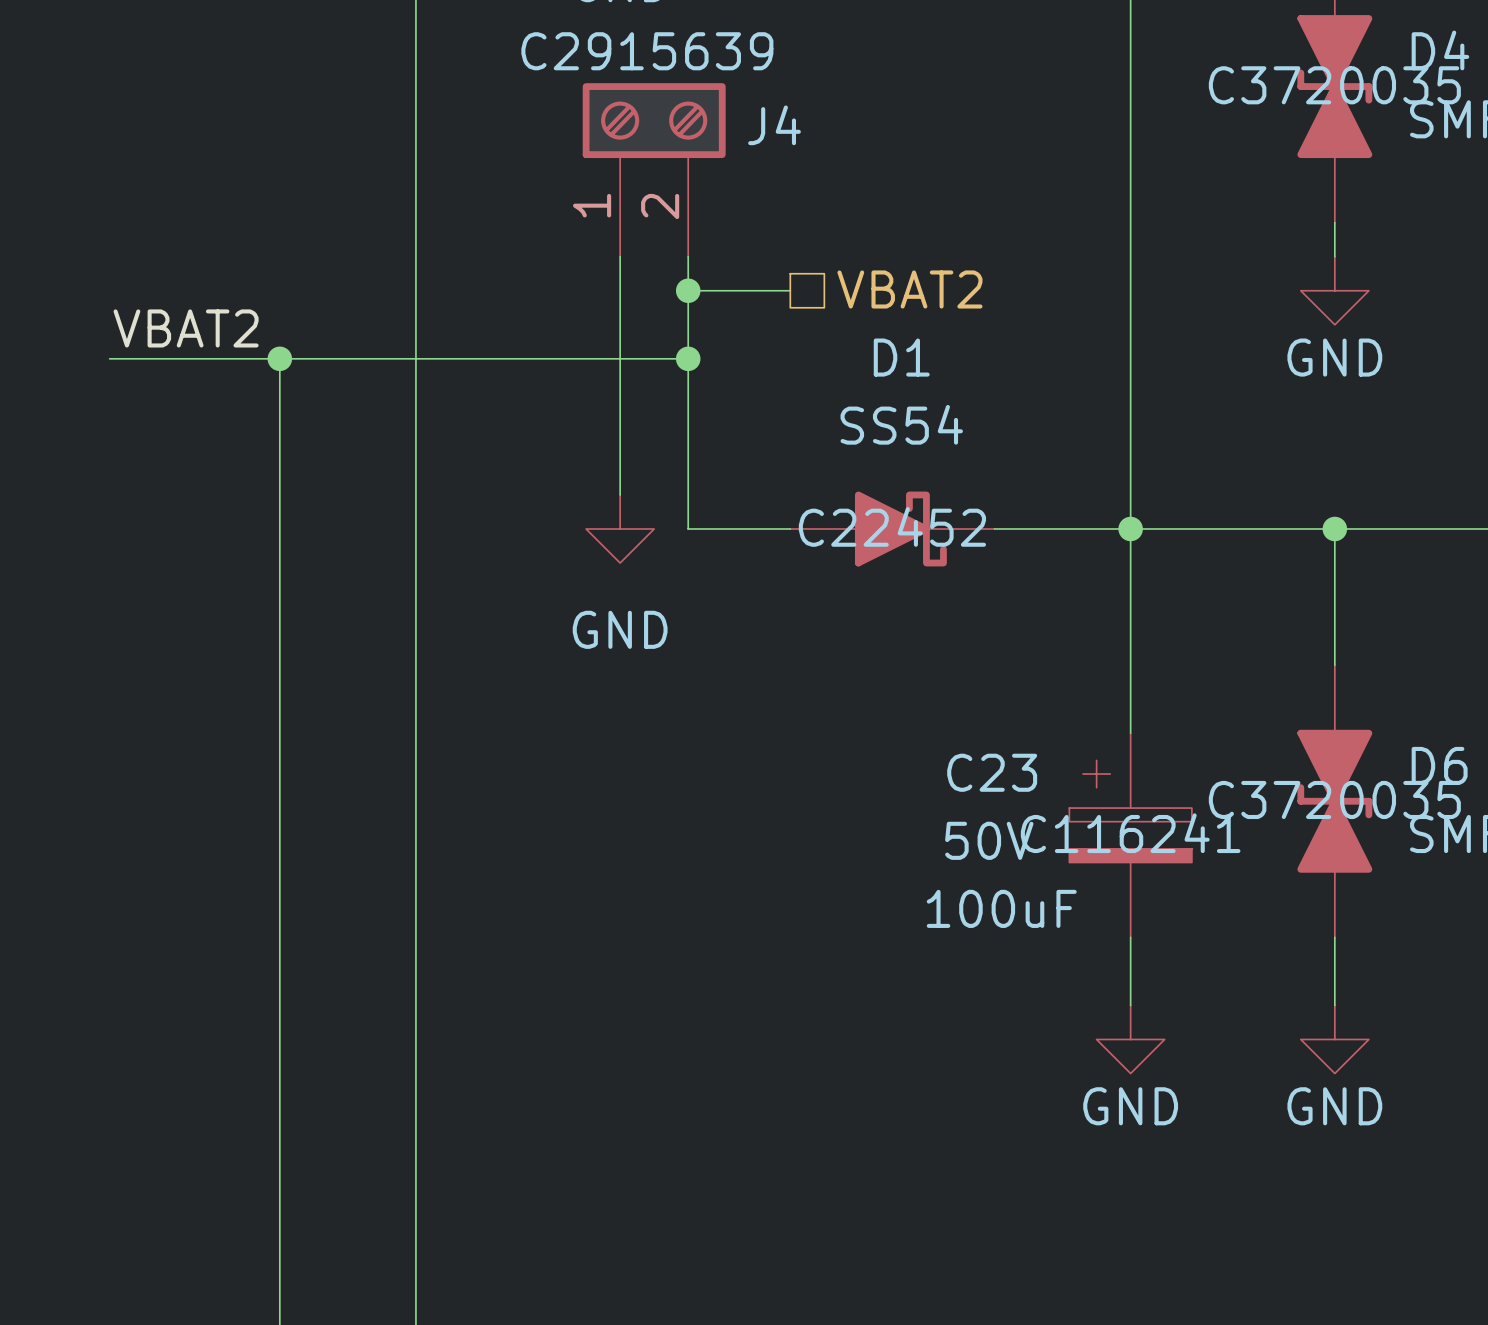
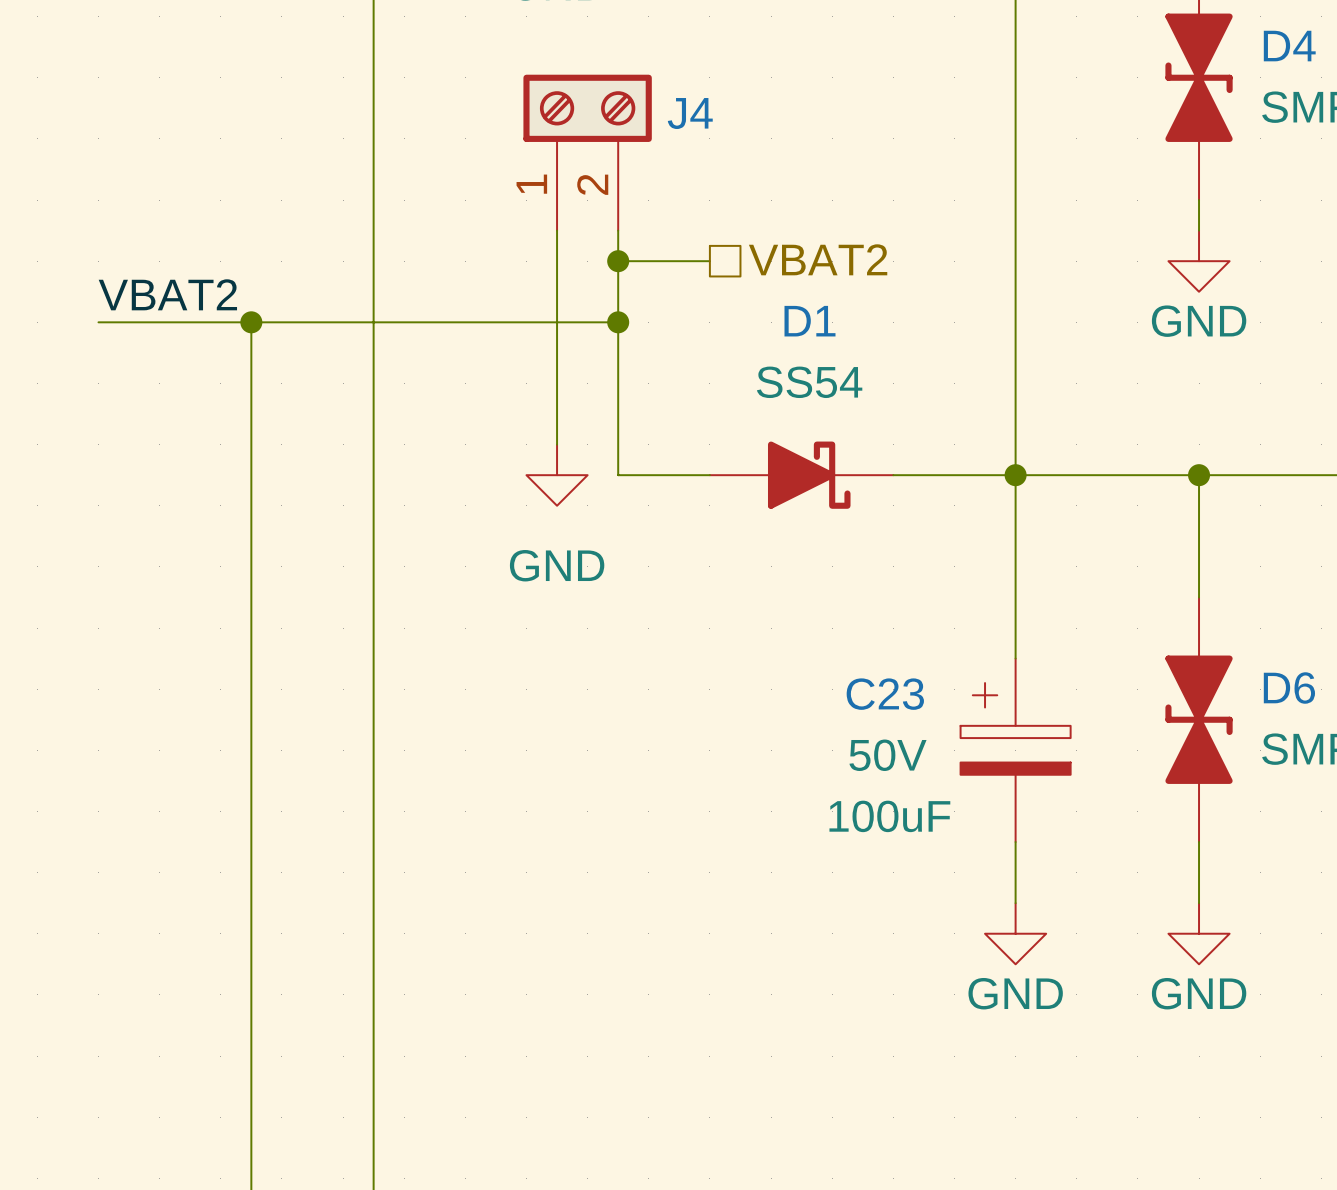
J4 text: C2915639 (647, 51) -> none
D4 text: C3720035 (1334, 85) -> none
D1 text: C22452 (892, 526) -> none
D6 text: C3720035 (1334, 799) -> none
C23 text: C116241 (1130, 833) -> none

